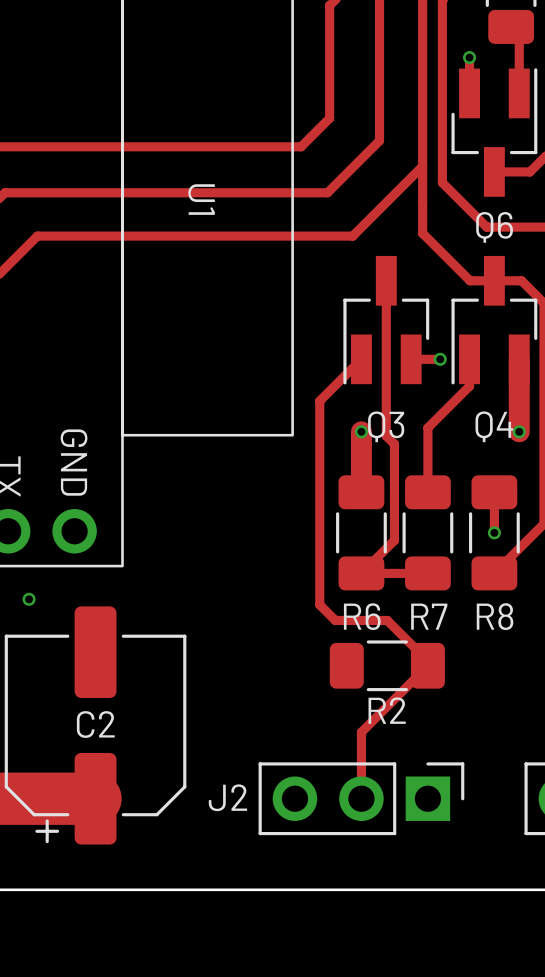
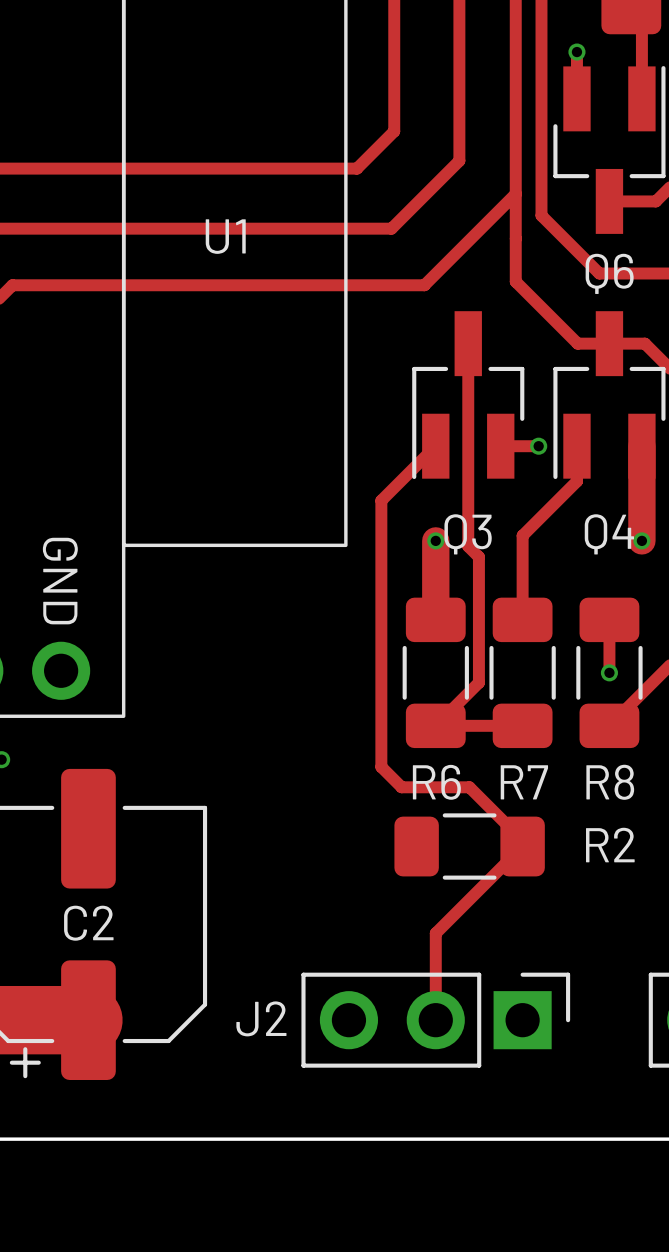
U1 name rotation: 0° (201, 199) -> 90° counterclockwise (225, 236)
R2 name position: R2 (387, 710) -> R2 (610, 845)

